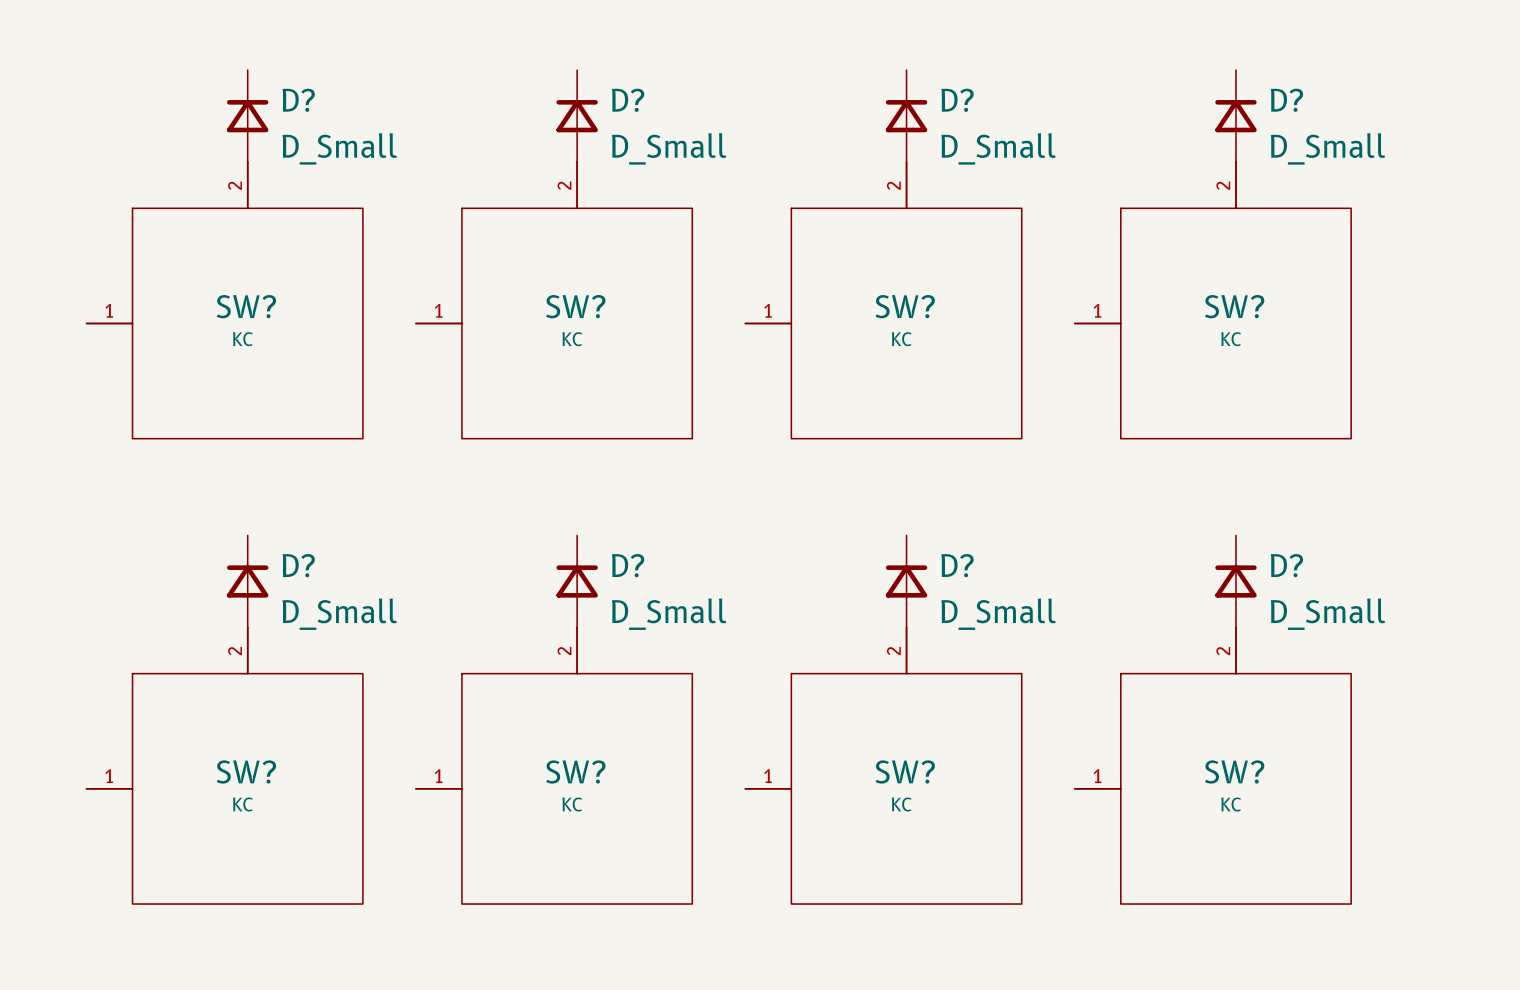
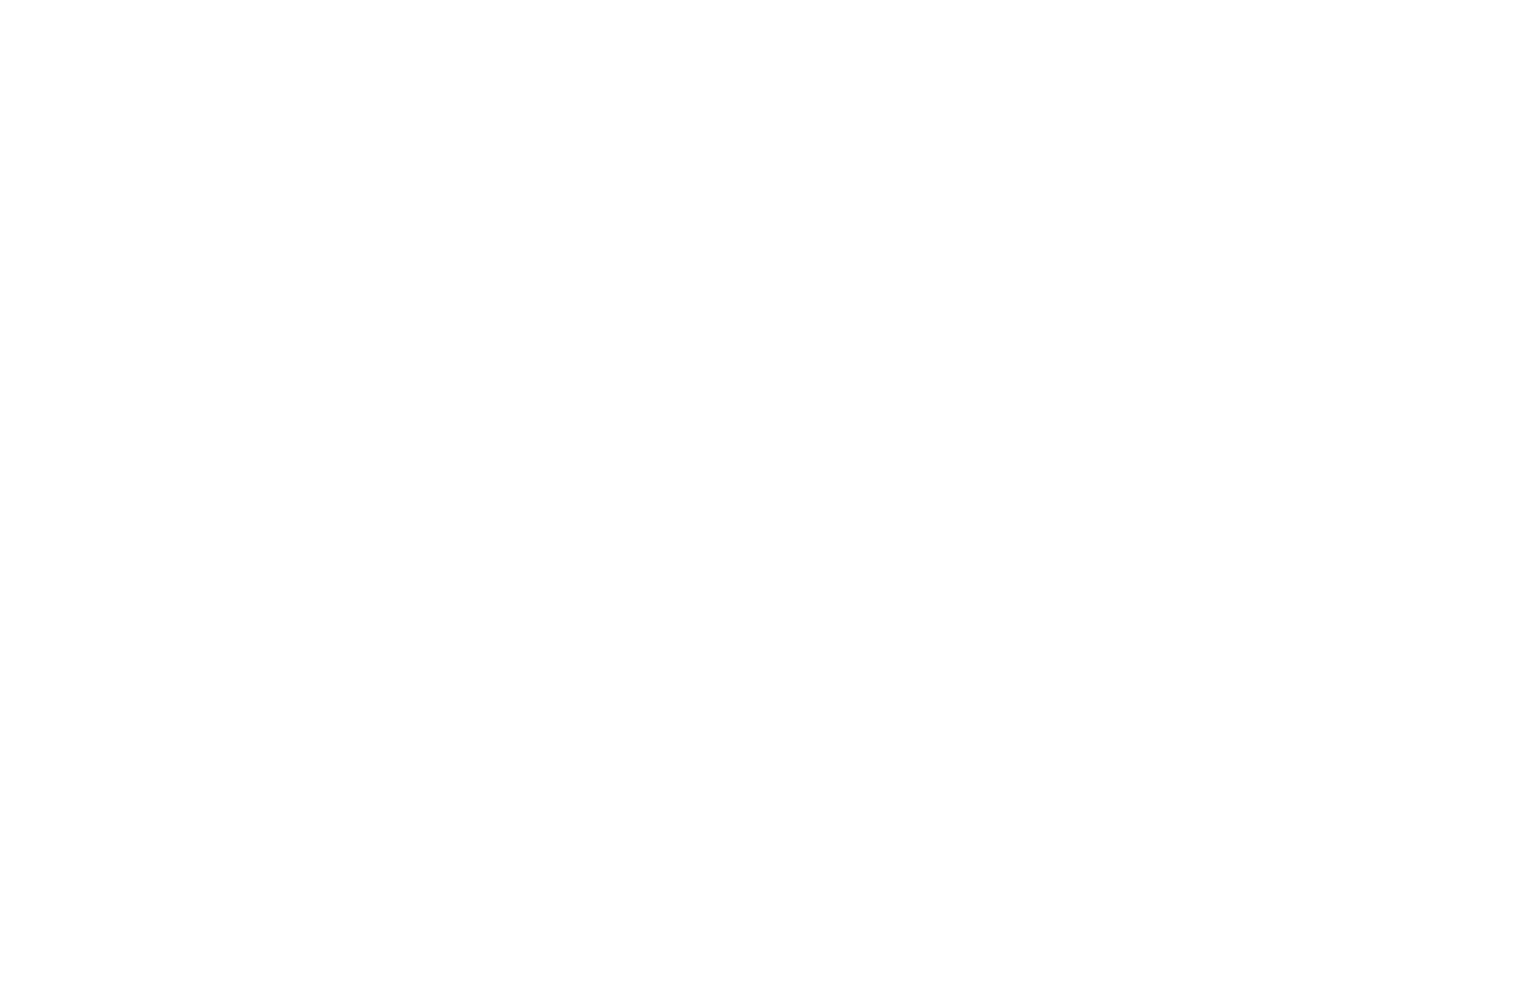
D?: D_Small (247, 116) -> none
D?: D_Small (577, 116) -> none
D?: D_Small (906, 116) -> none
D?: D_Small (1235, 116) -> none
SW?: (224, 300) -> none
SW?: (554, 300) -> none
SW?: (883, 300) -> none
SW?: (1212, 300) -> none
D?: D_Small (247, 581) -> none
D?: D_Small (577, 581) -> none
D?: D_Small (906, 581) -> none
D?: D_Small (1235, 581) -> none
SW?: (224, 765) -> none
SW?: (554, 765) -> none
SW?: (883, 765) -> none
SW?: (1212, 765) -> none

